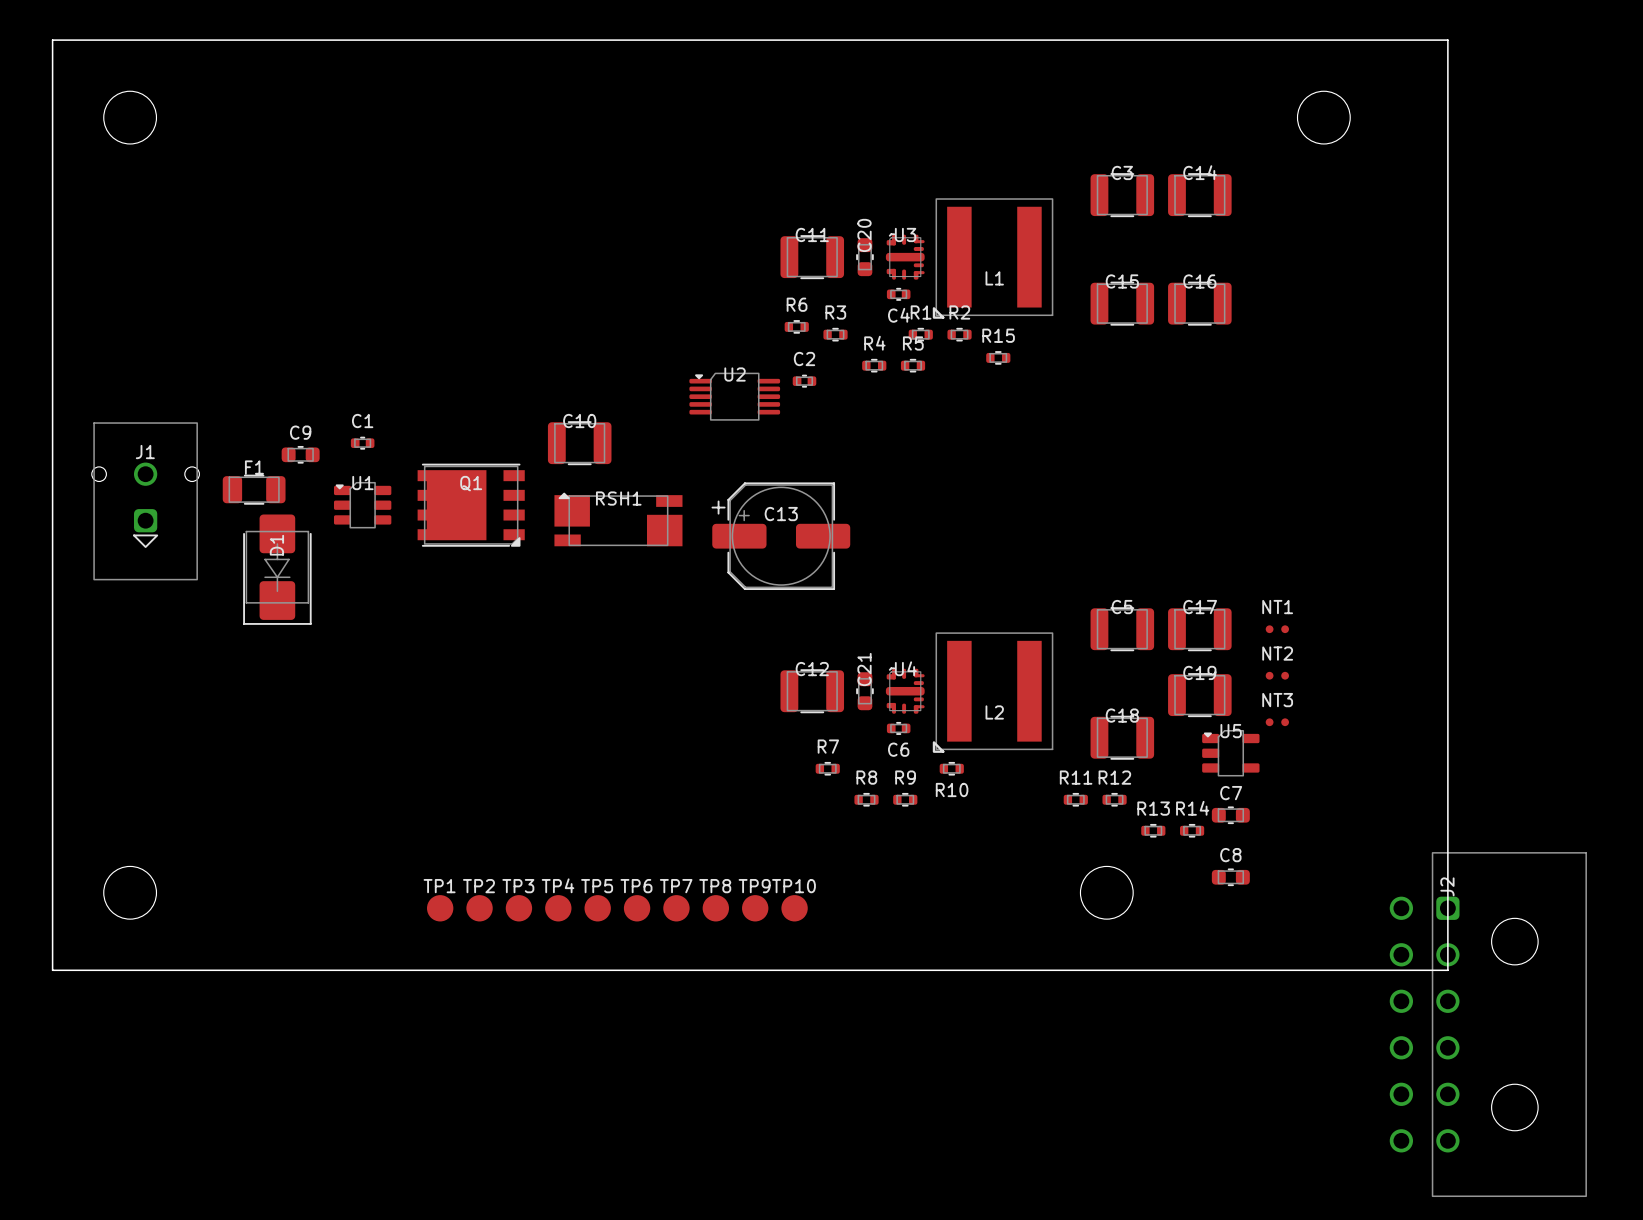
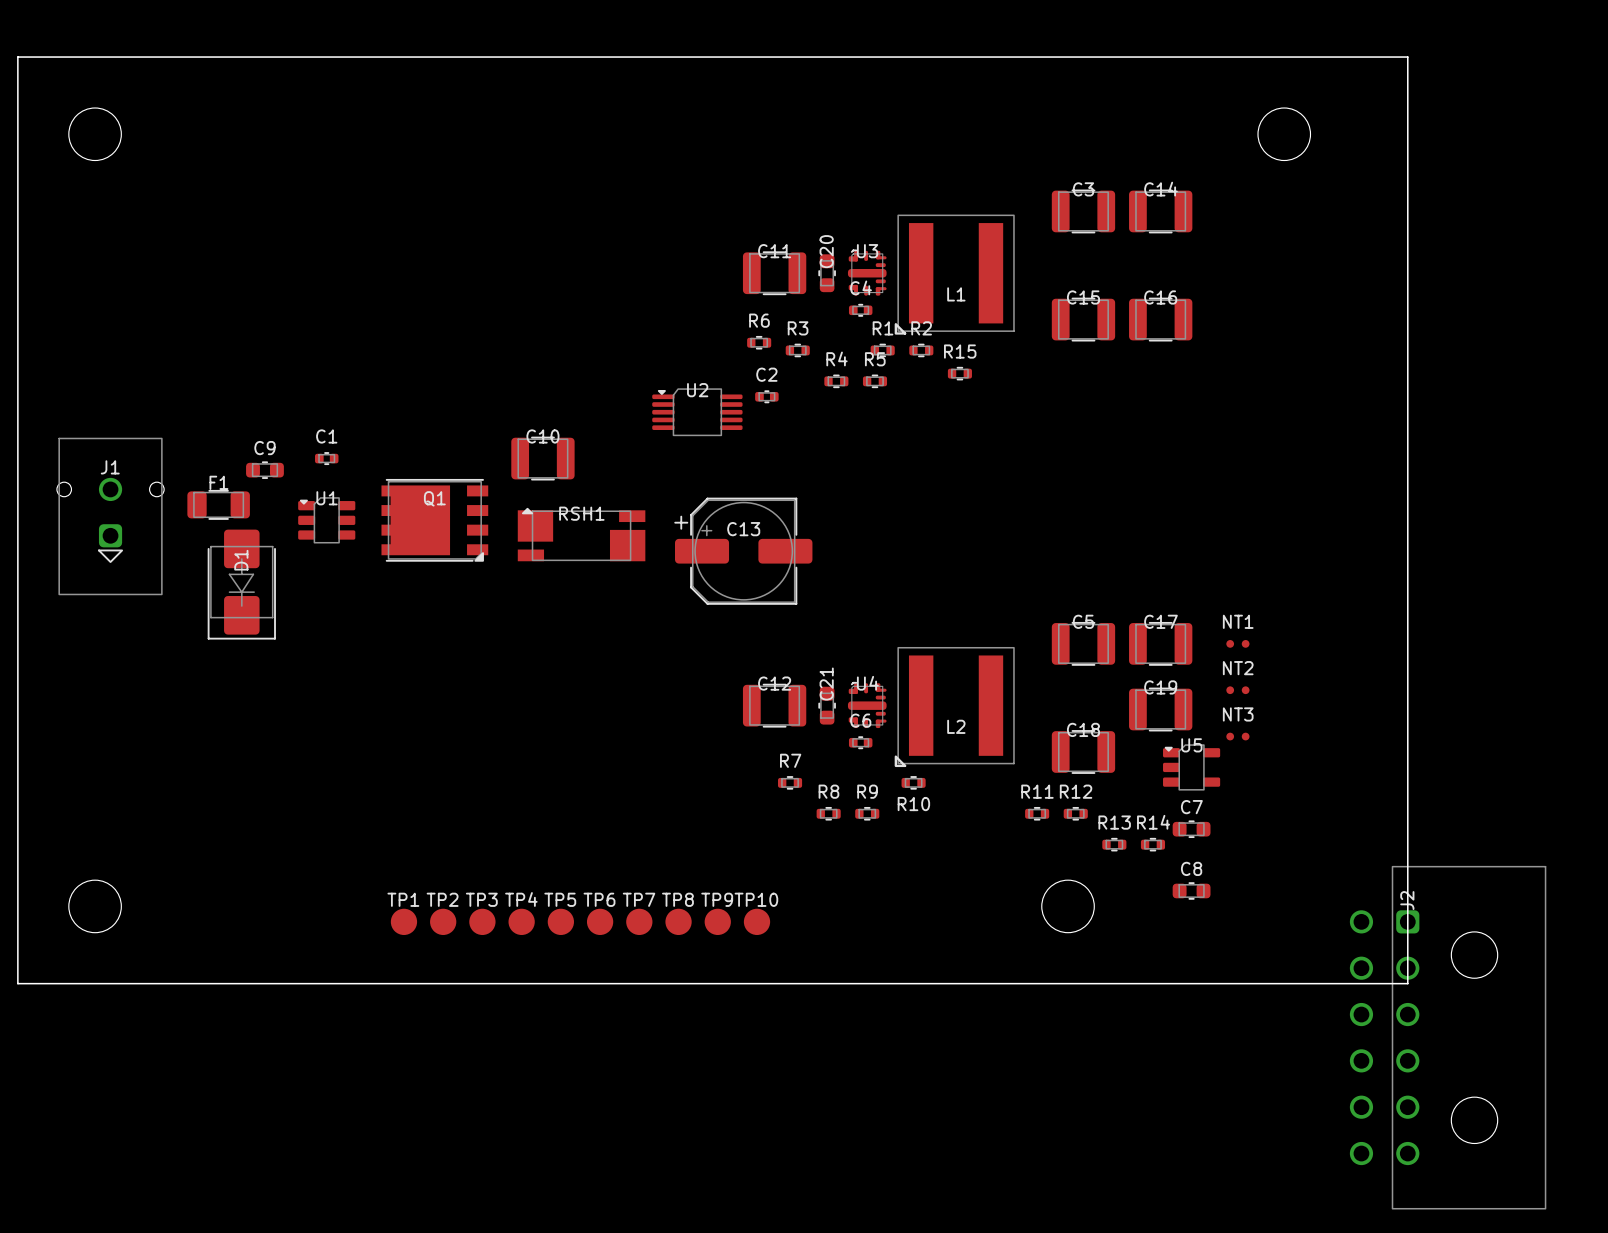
C4 name position: C4 (898, 315) -> C4 (861, 287)
C6 name position: C6 (898, 749) -> C6 (860, 720)

